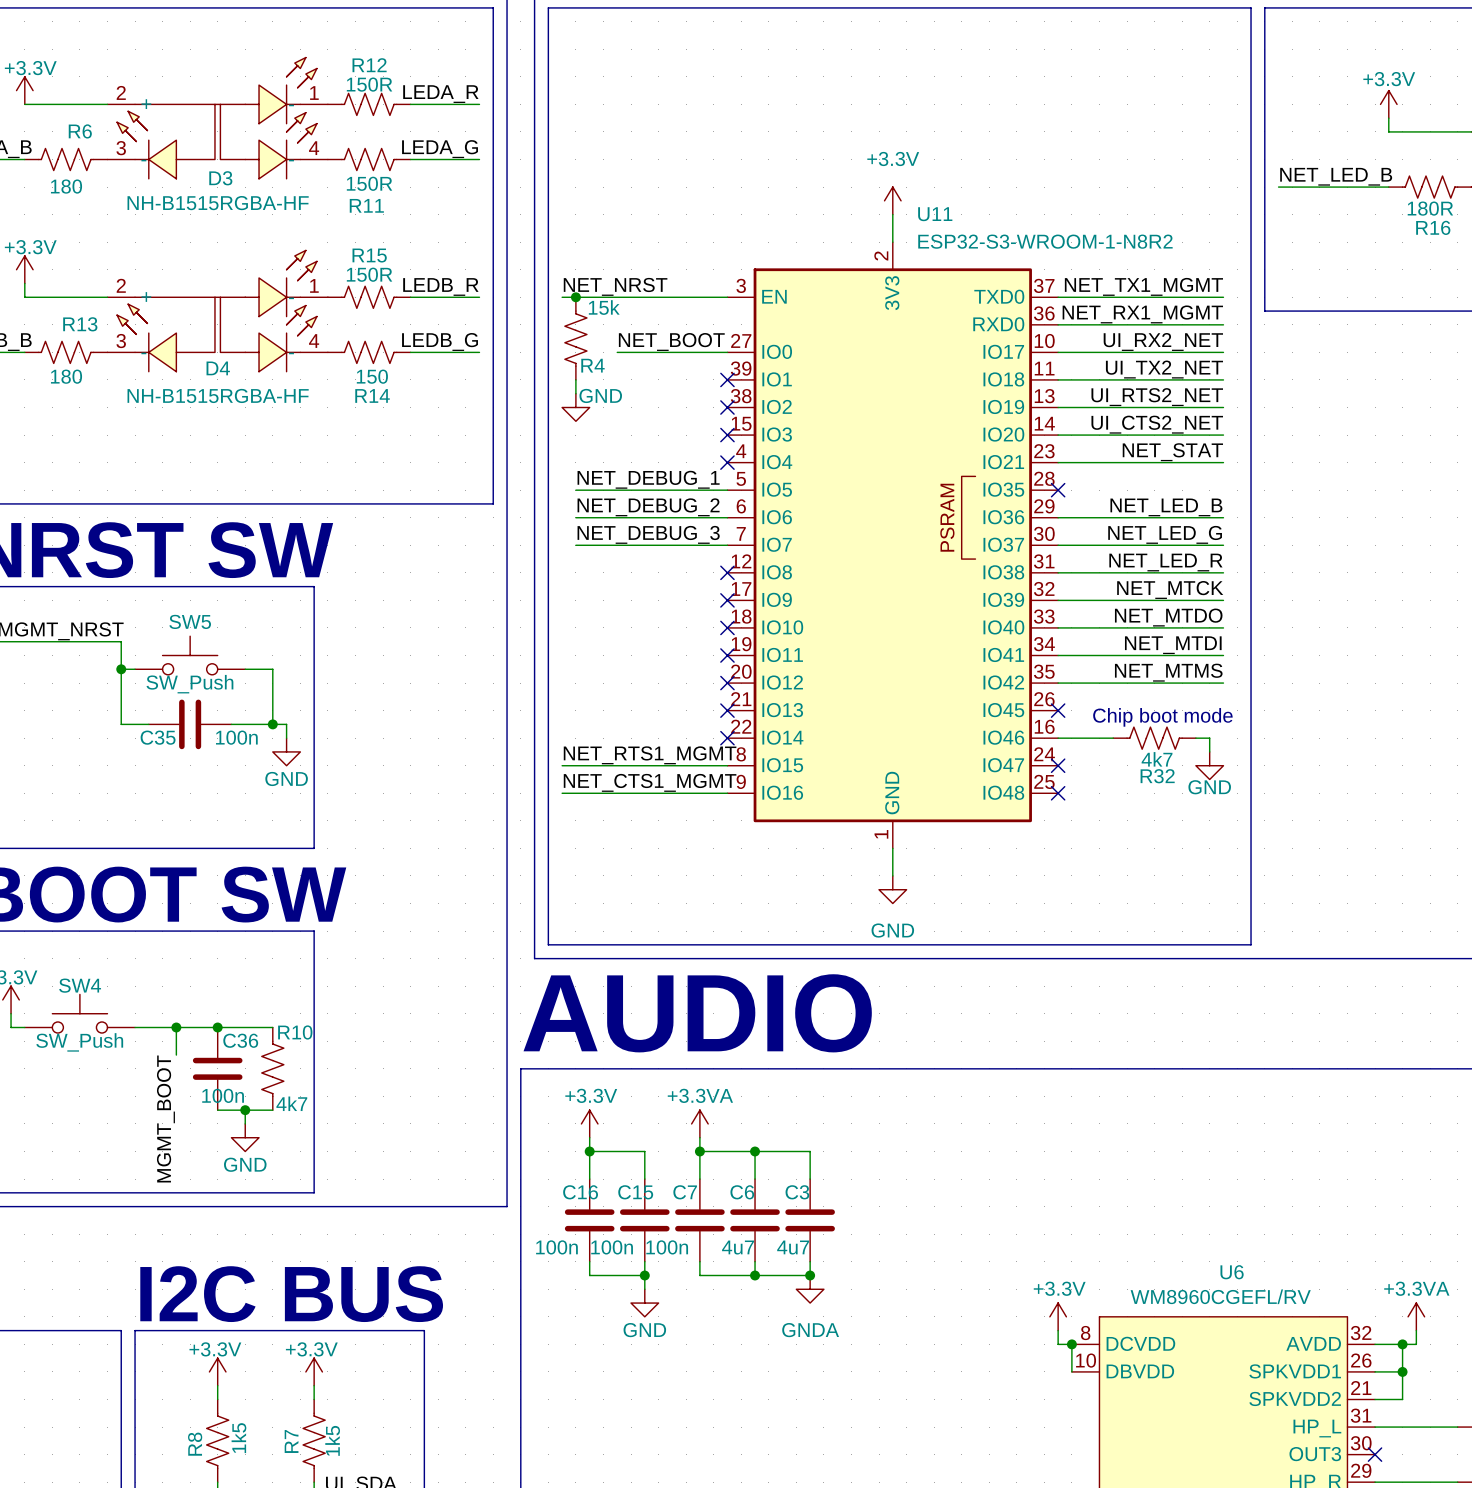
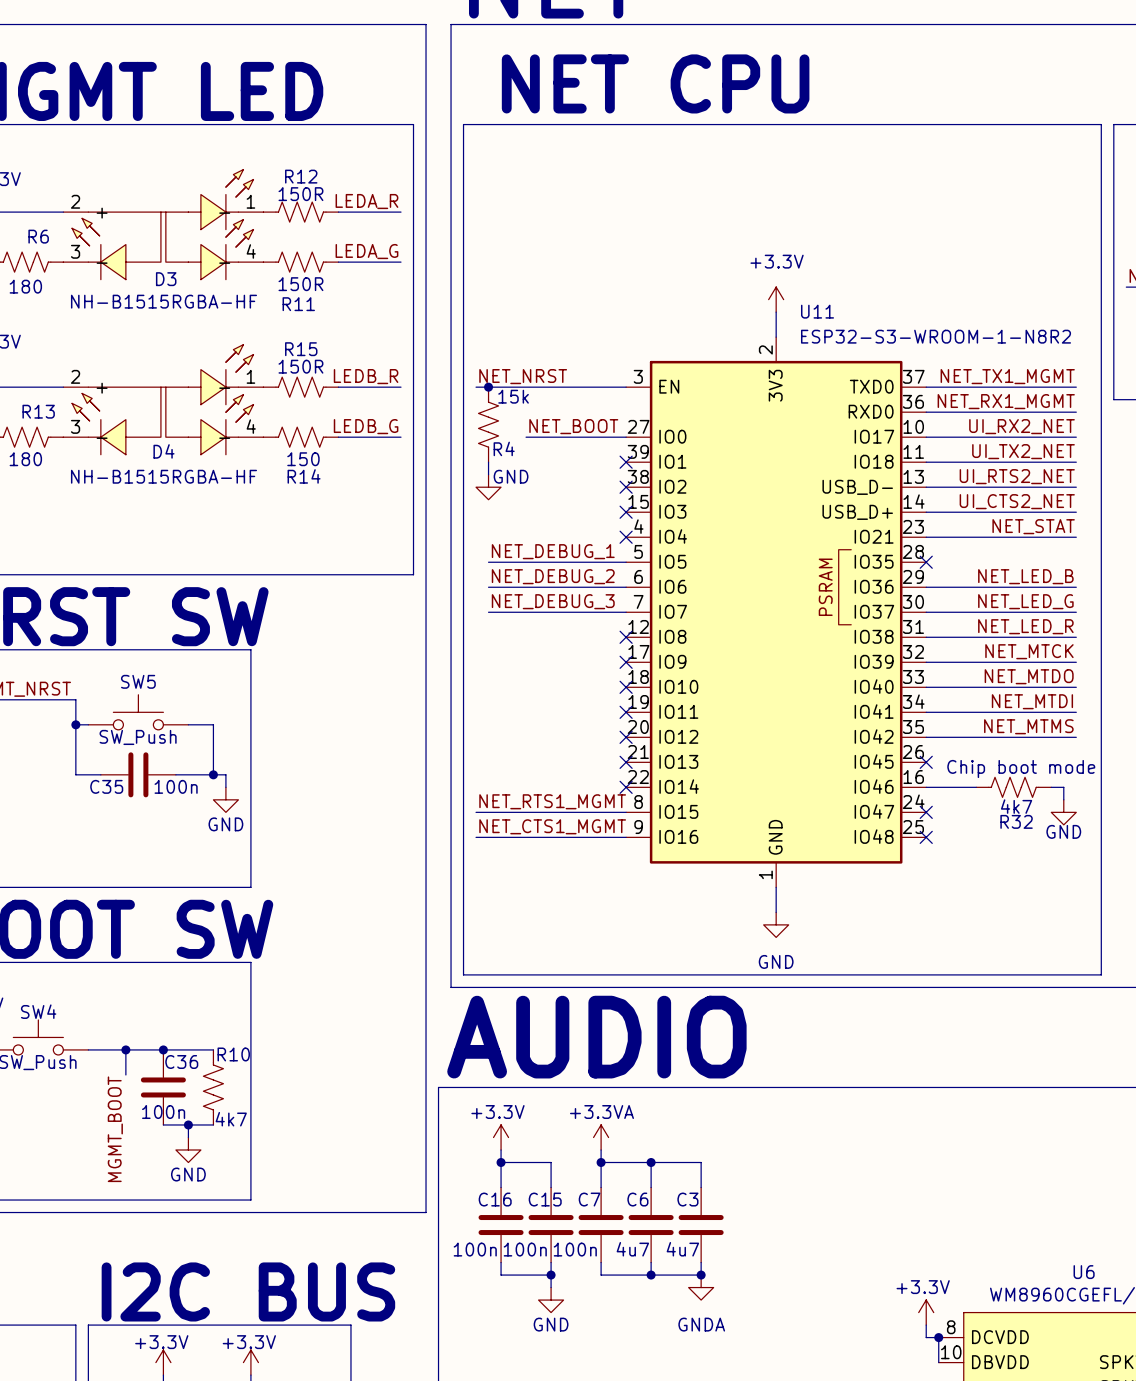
U11 pin name: IO19 (1003, 406) -> USB_D- (857, 487)
U11 pin name: IO20 (1003, 434) -> USB_D+ (857, 512)

